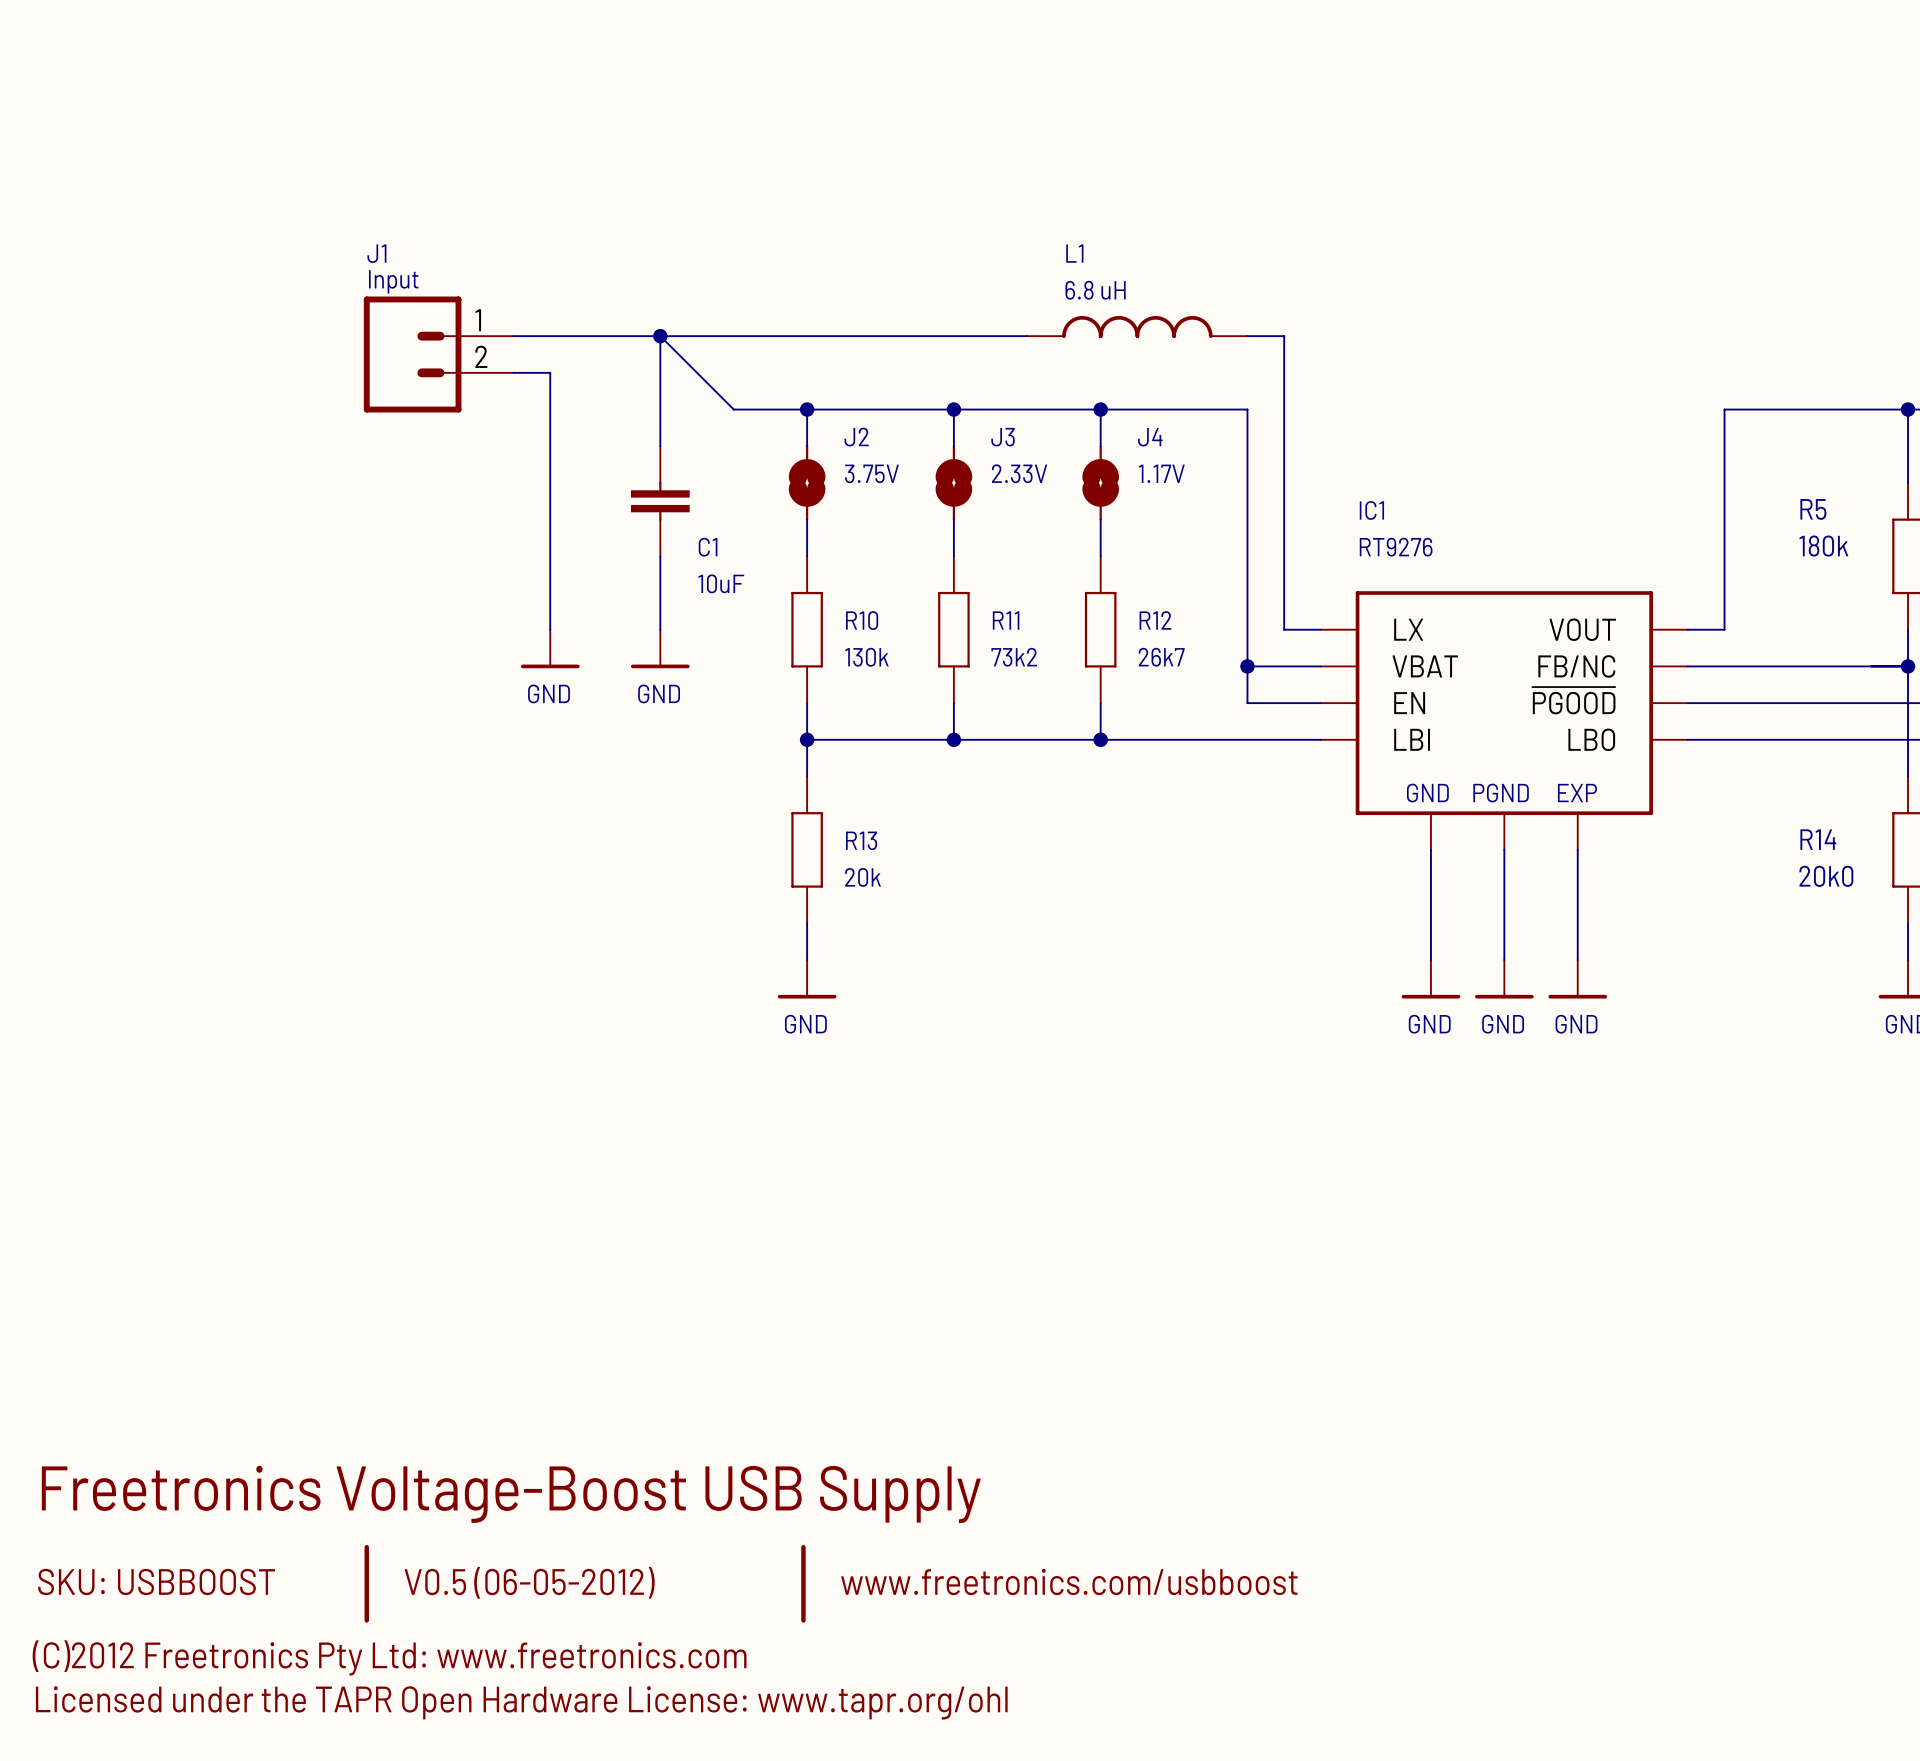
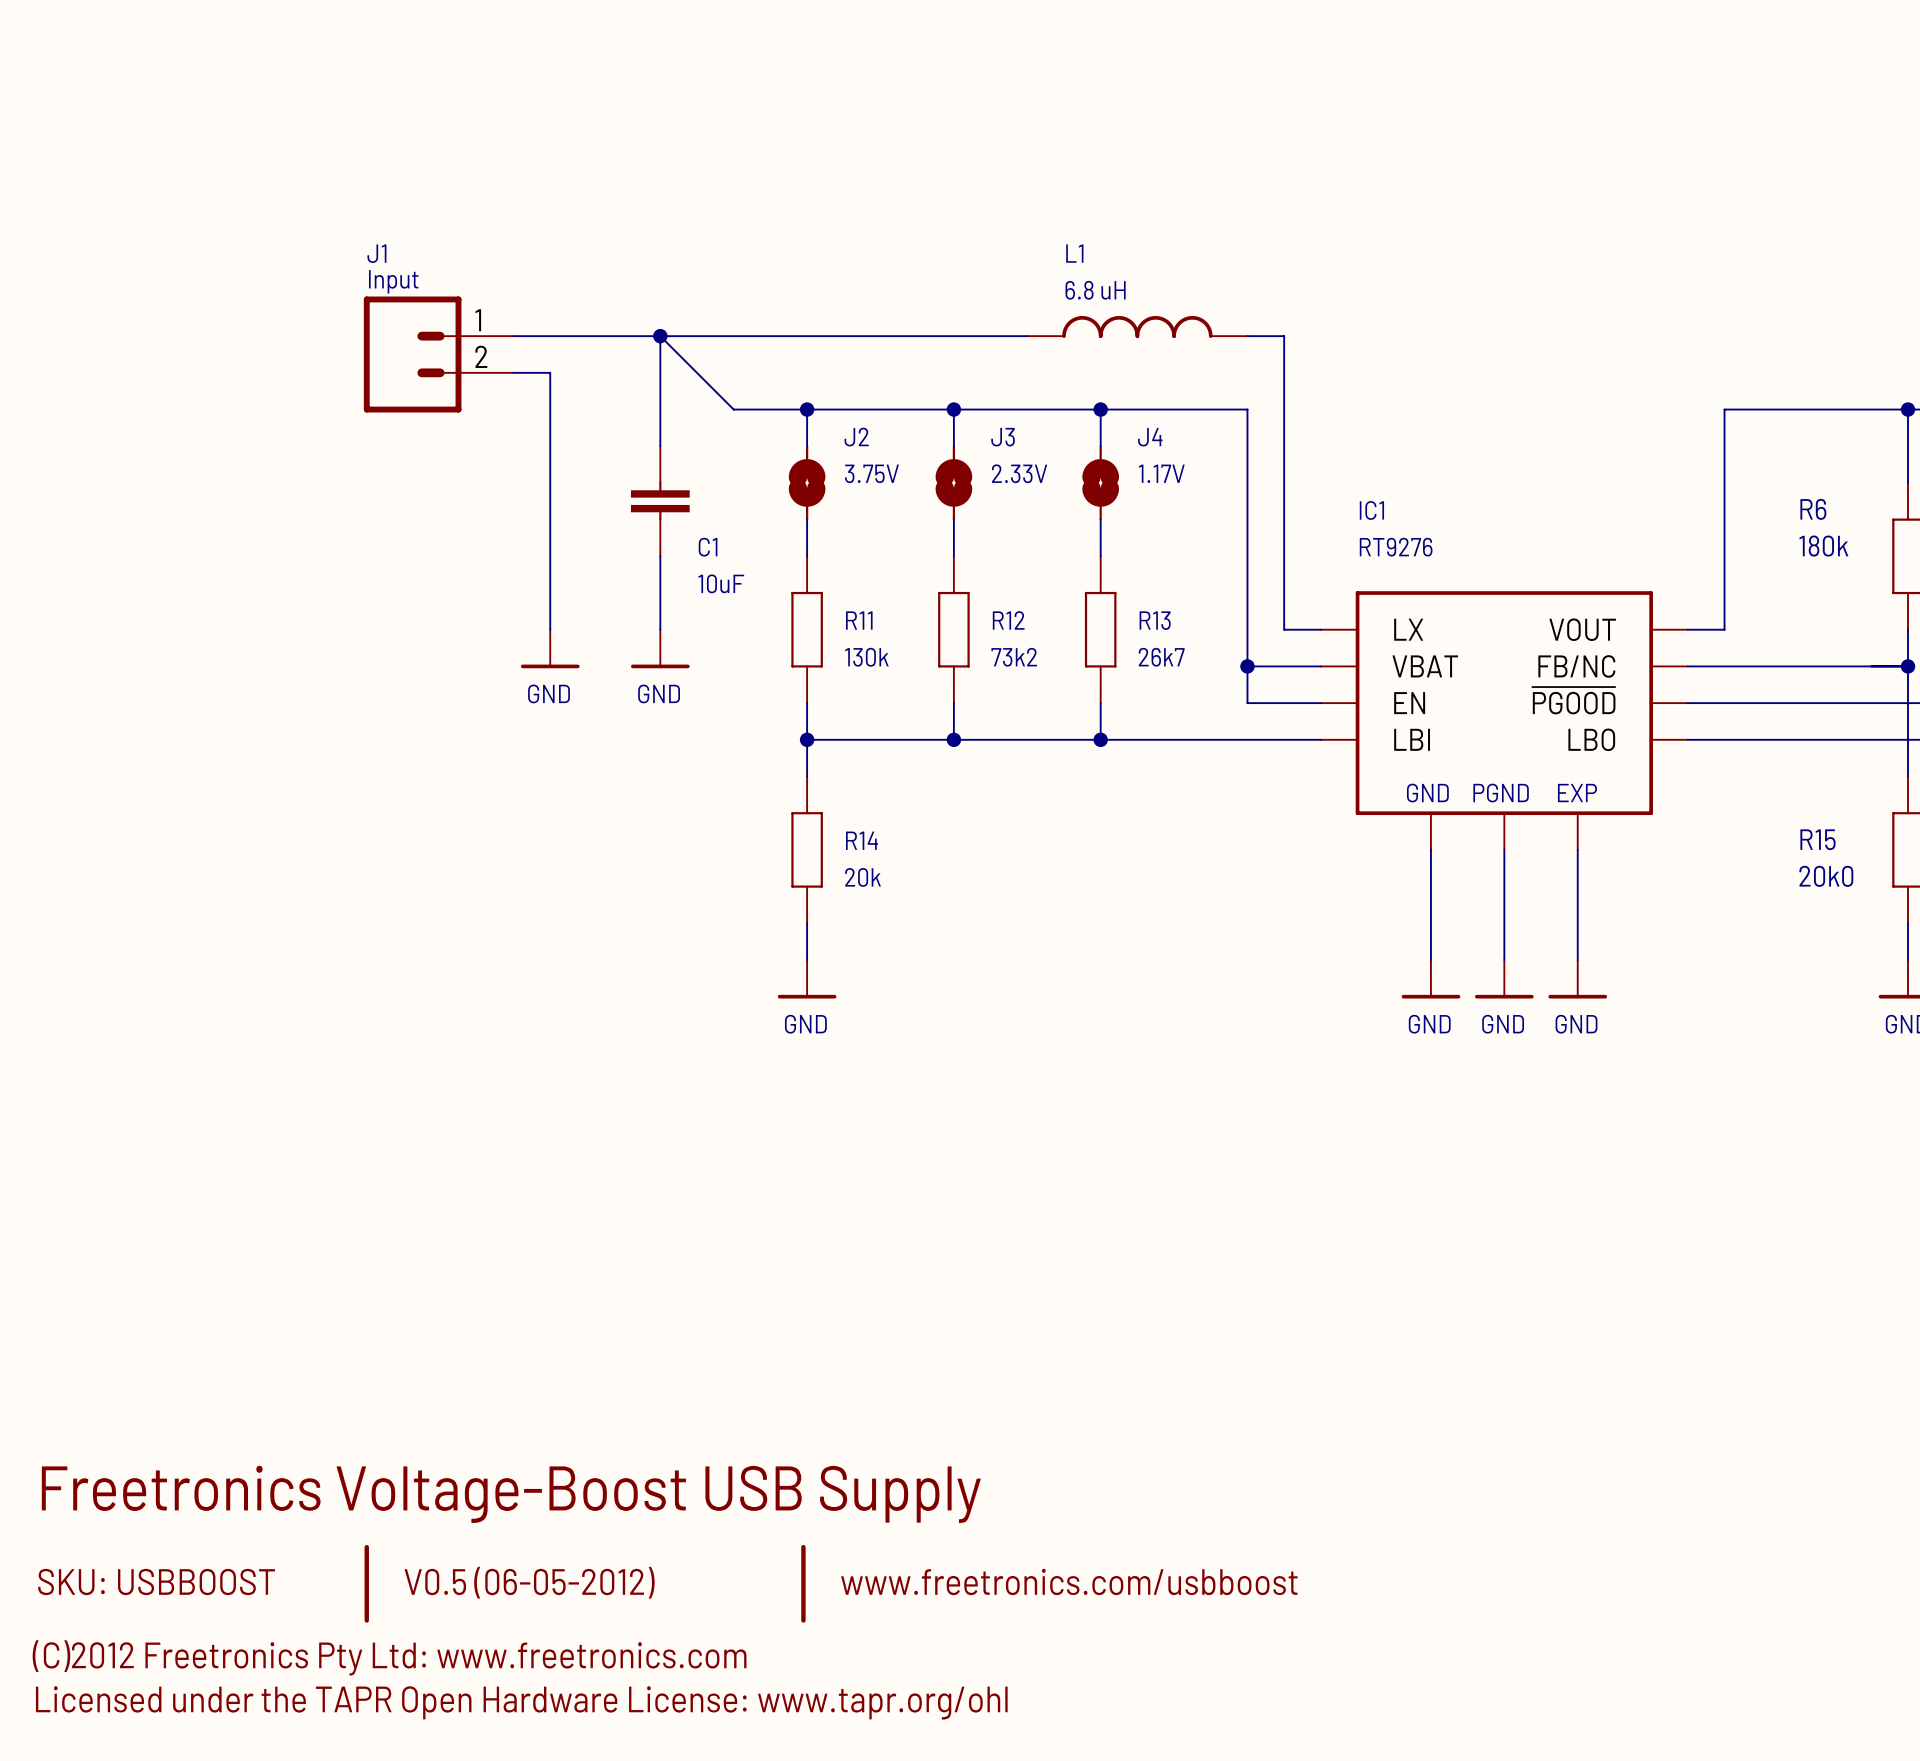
R5 name: R5 (1813, 509) -> R6 (1813, 509)
R10 name: R10 (862, 620) -> R11 (859, 620)
R11 name: R11 (1006, 620) -> R12 (1008, 620)
R12 name: R12 (1155, 620) -> R13 (1155, 620)
R14 name: R14 (1818, 839) -> R15 (1818, 839)
R13 name: R13 (861, 840) -> R14 (862, 840)

